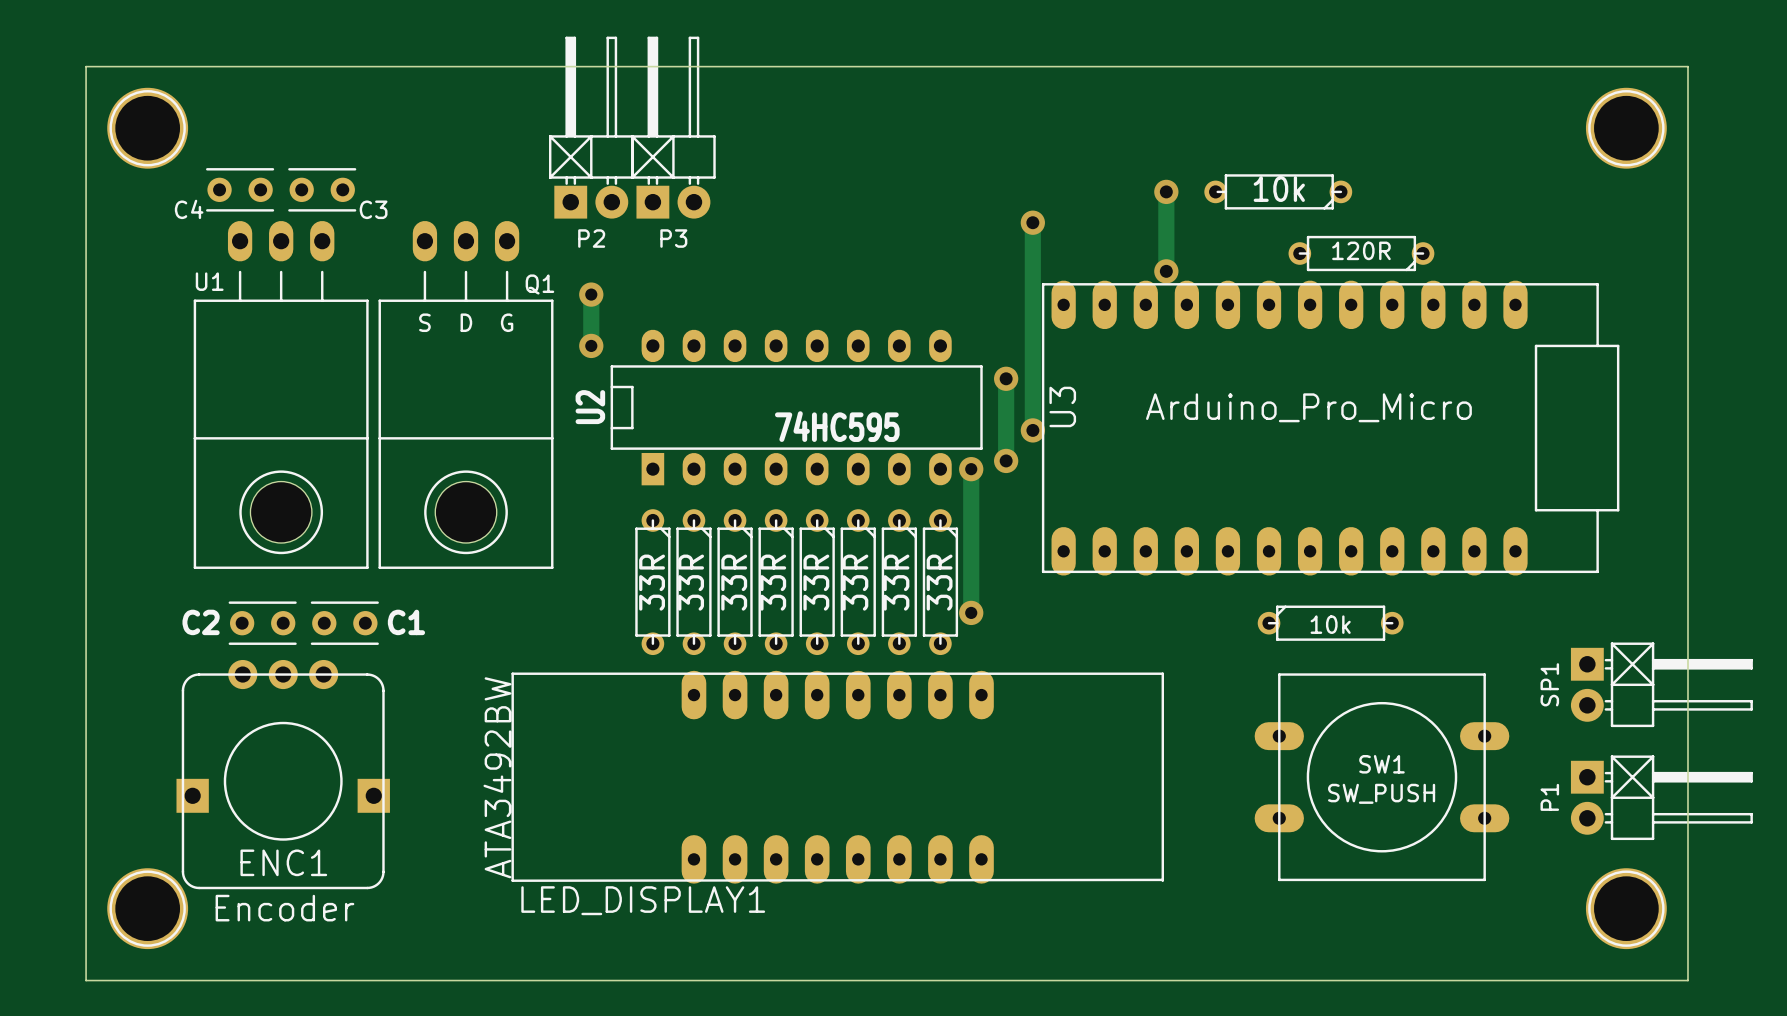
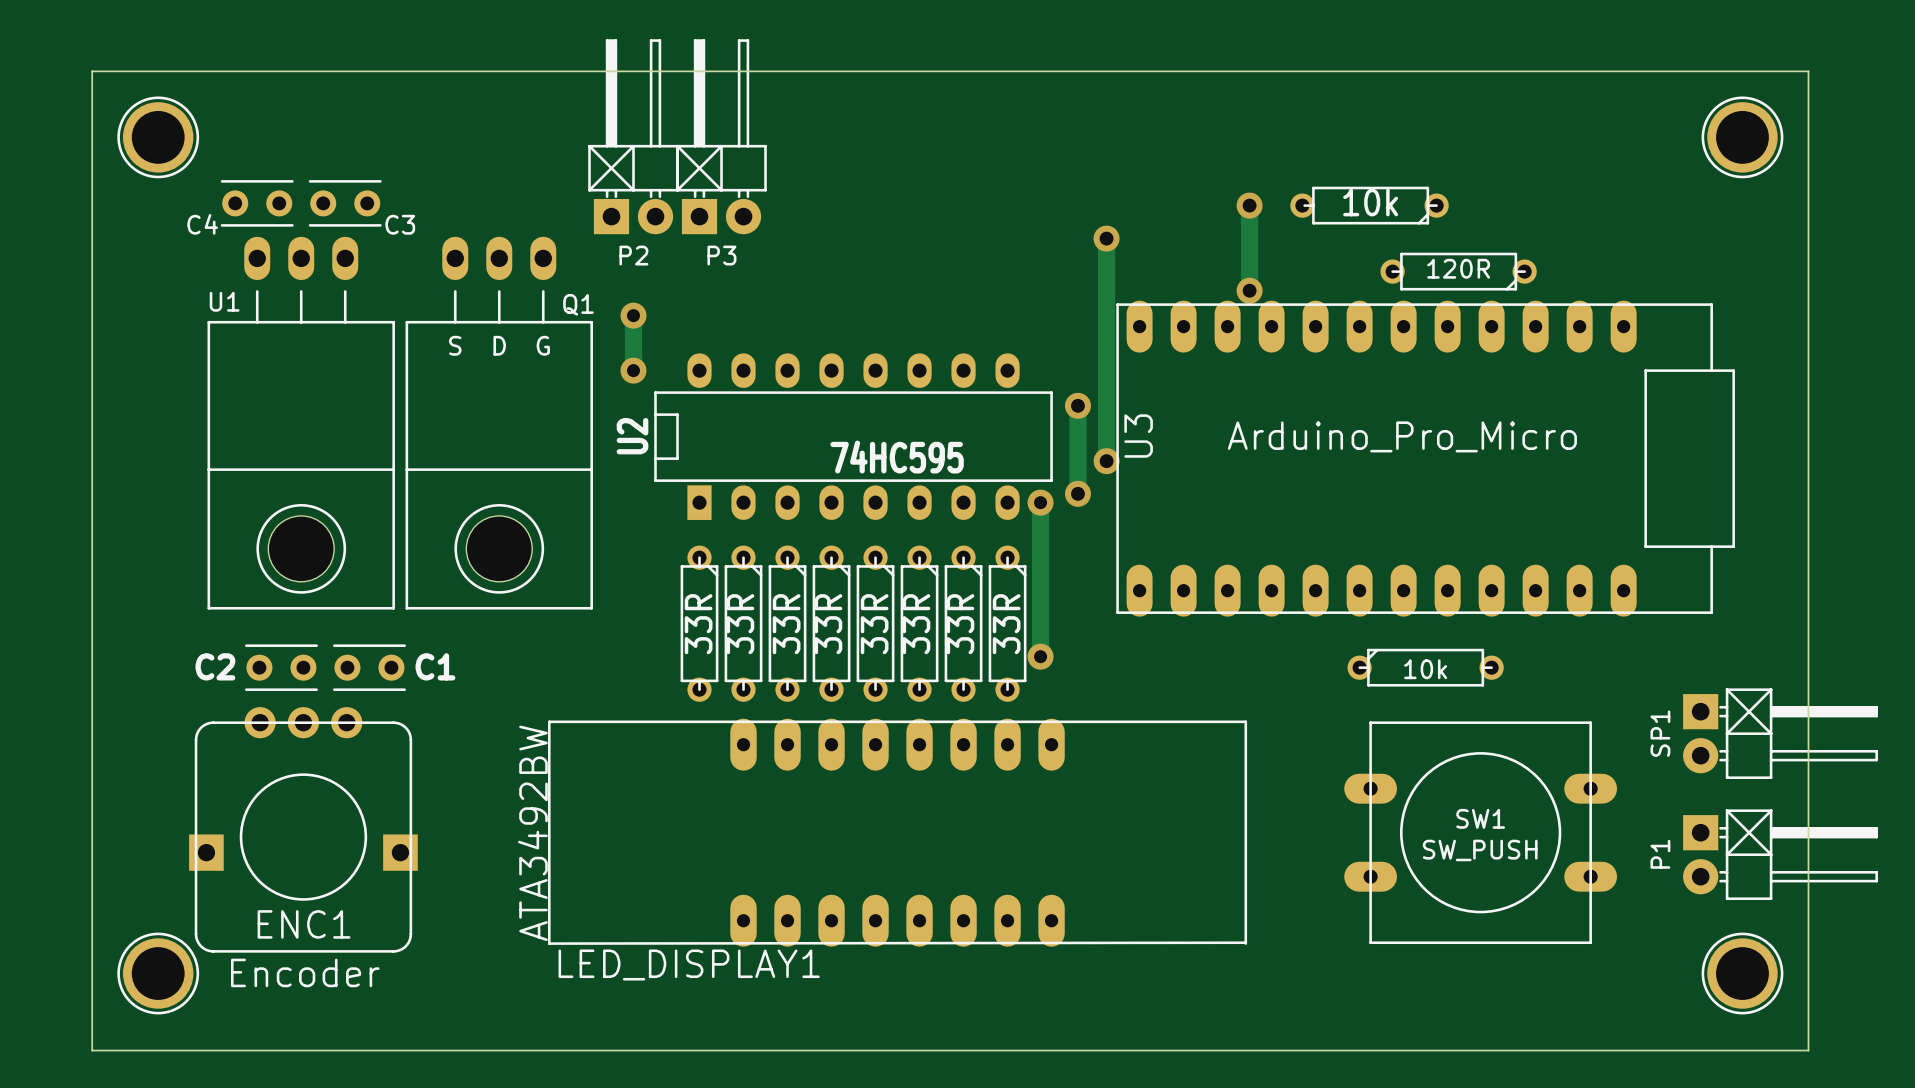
part footprint: [107, 87, 189, 169] -> [117, 96, 200, 179]
part footprint: [1585, 87, 1667, 169] -> [1701, 96, 1784, 179]
part footprint: [107, 868, 189, 950] -> [117, 932, 200, 1015]
part footprint: [1585, 868, 1667, 950] -> [1701, 932, 1784, 1015]

